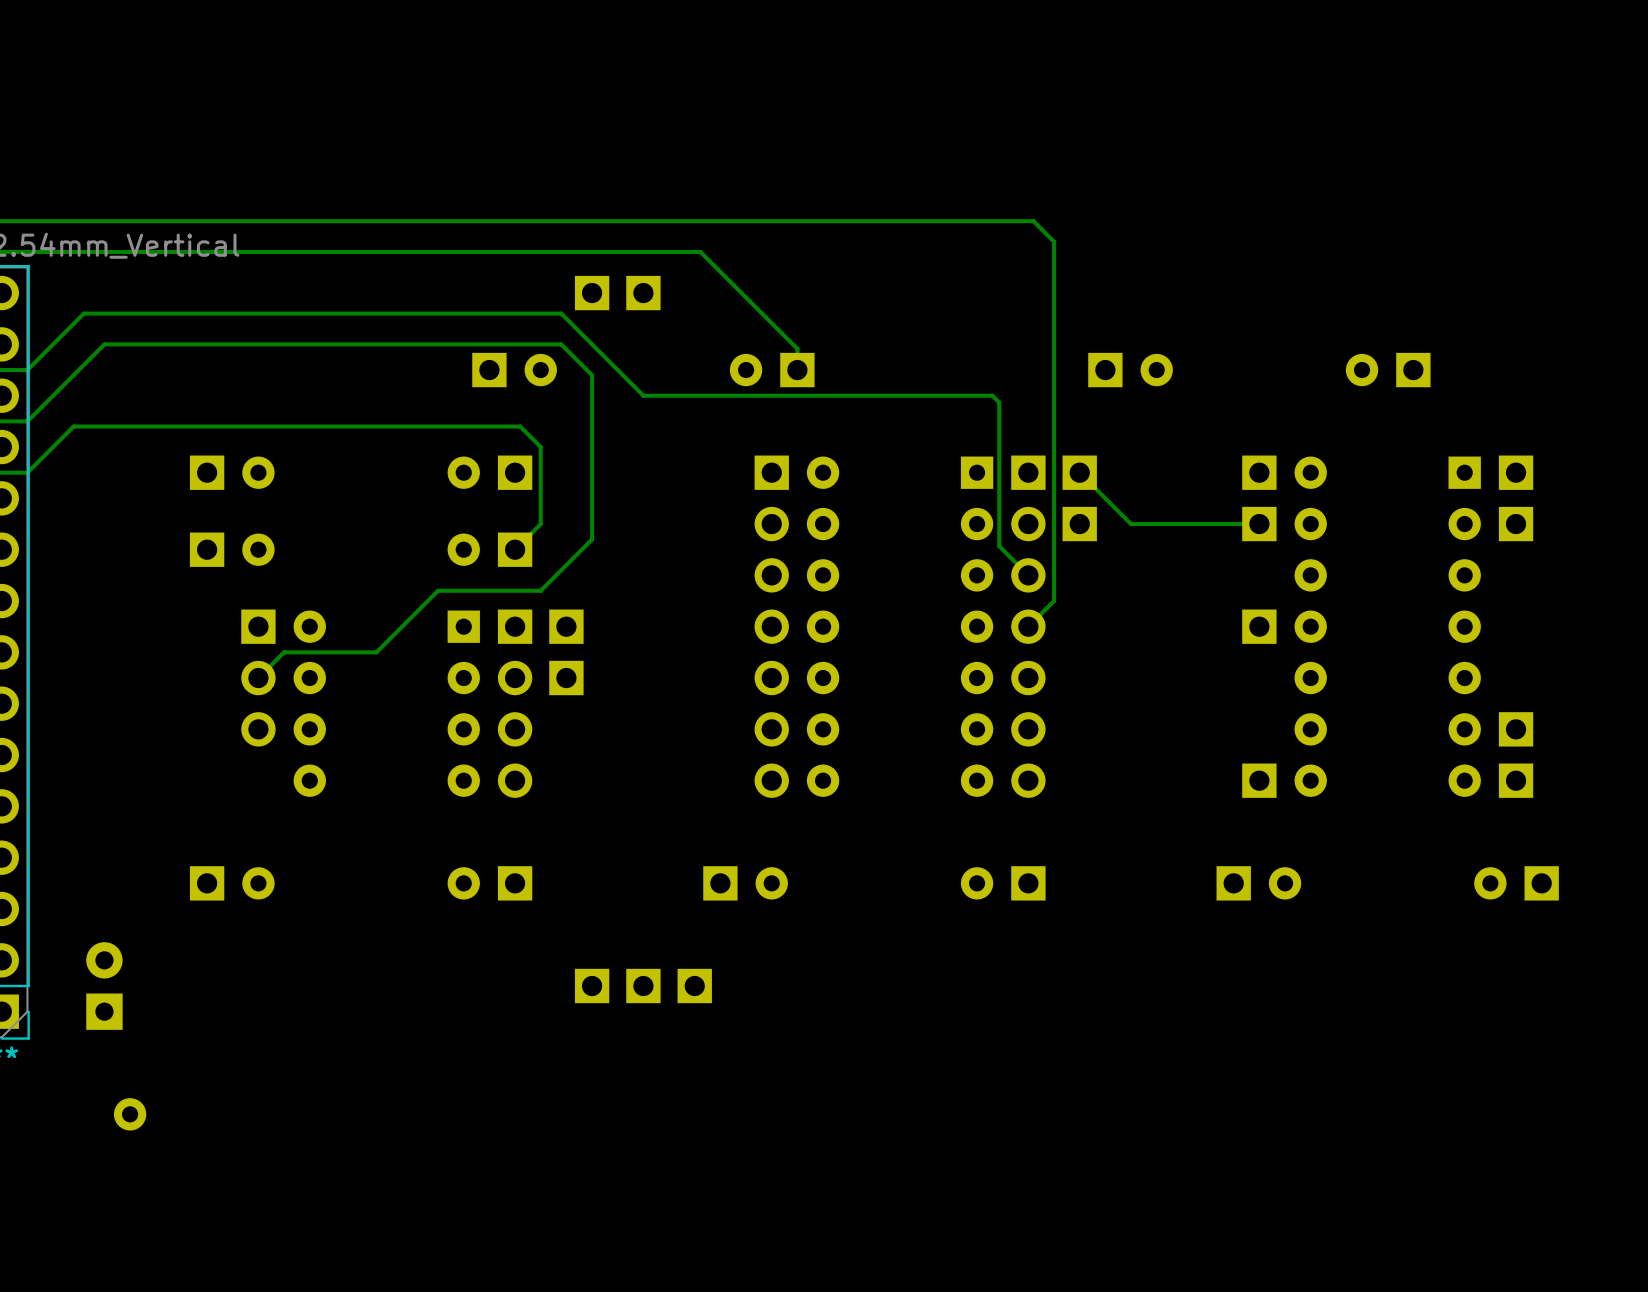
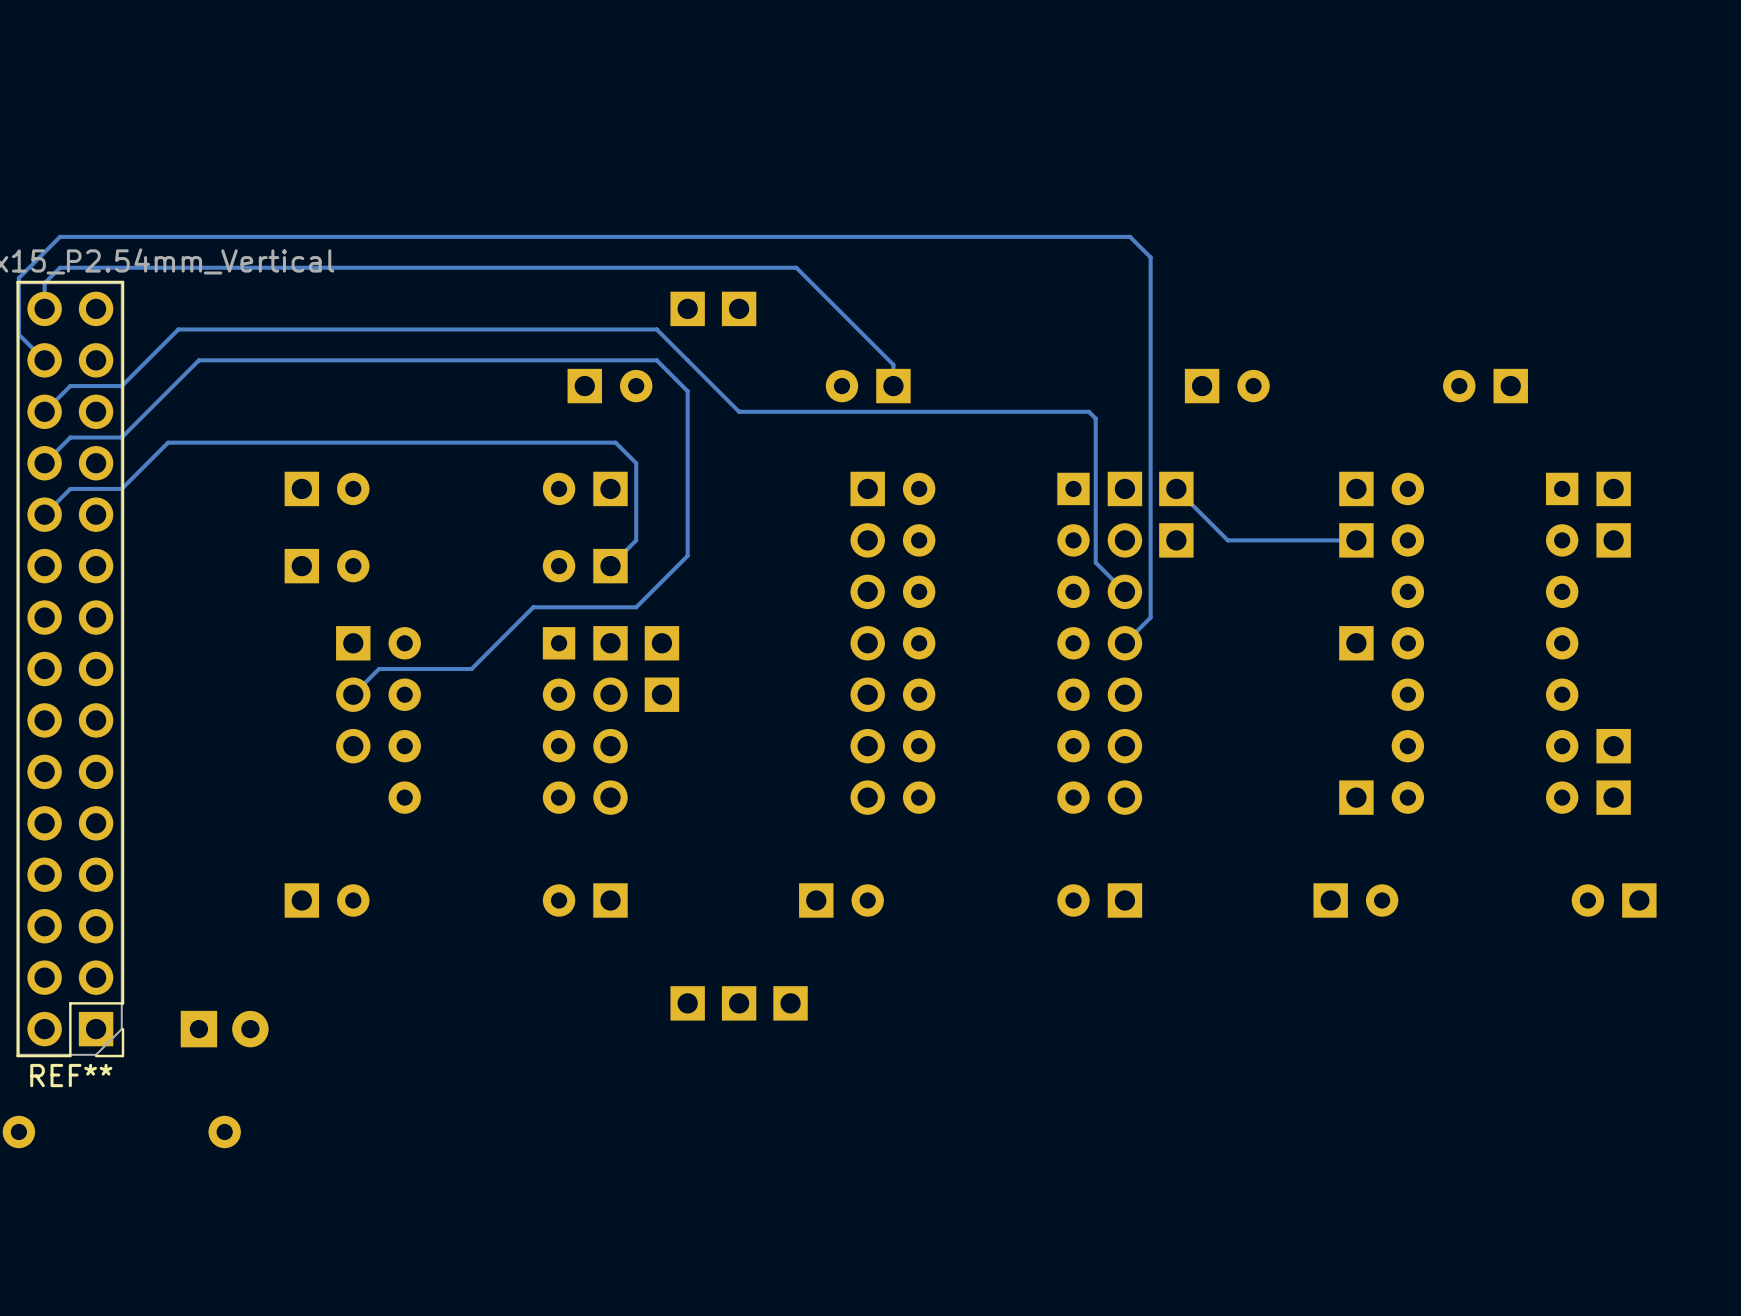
part rotation: 0° (104, 986) -> 90° clockwise (224, 1029)

